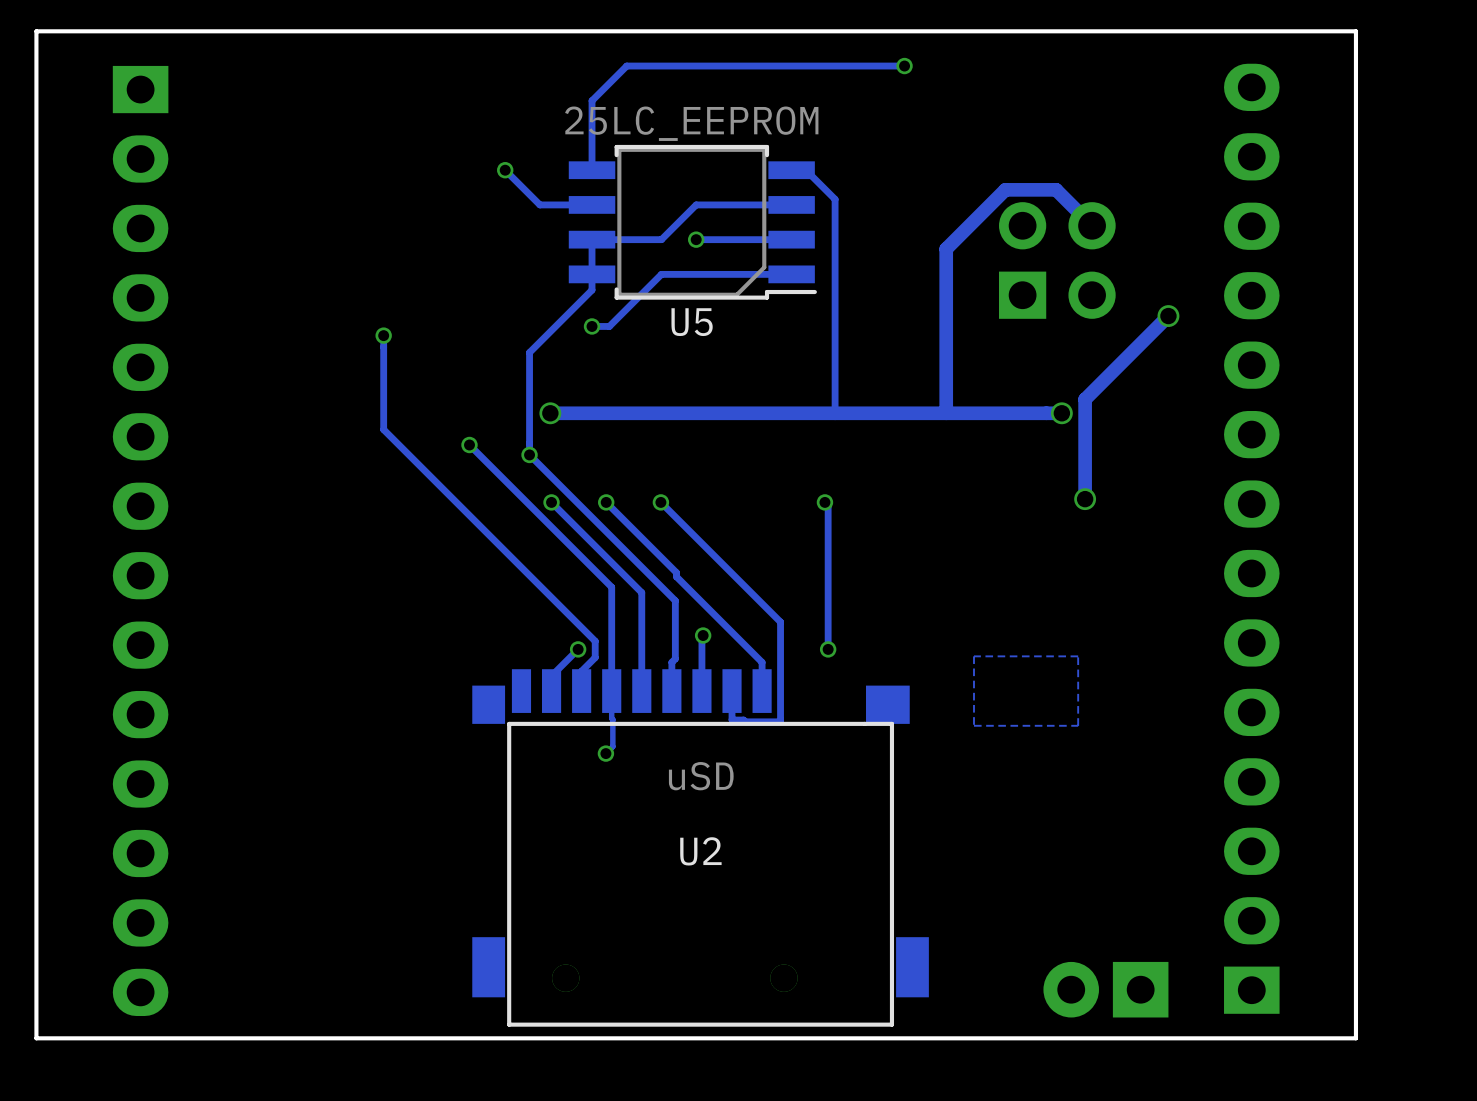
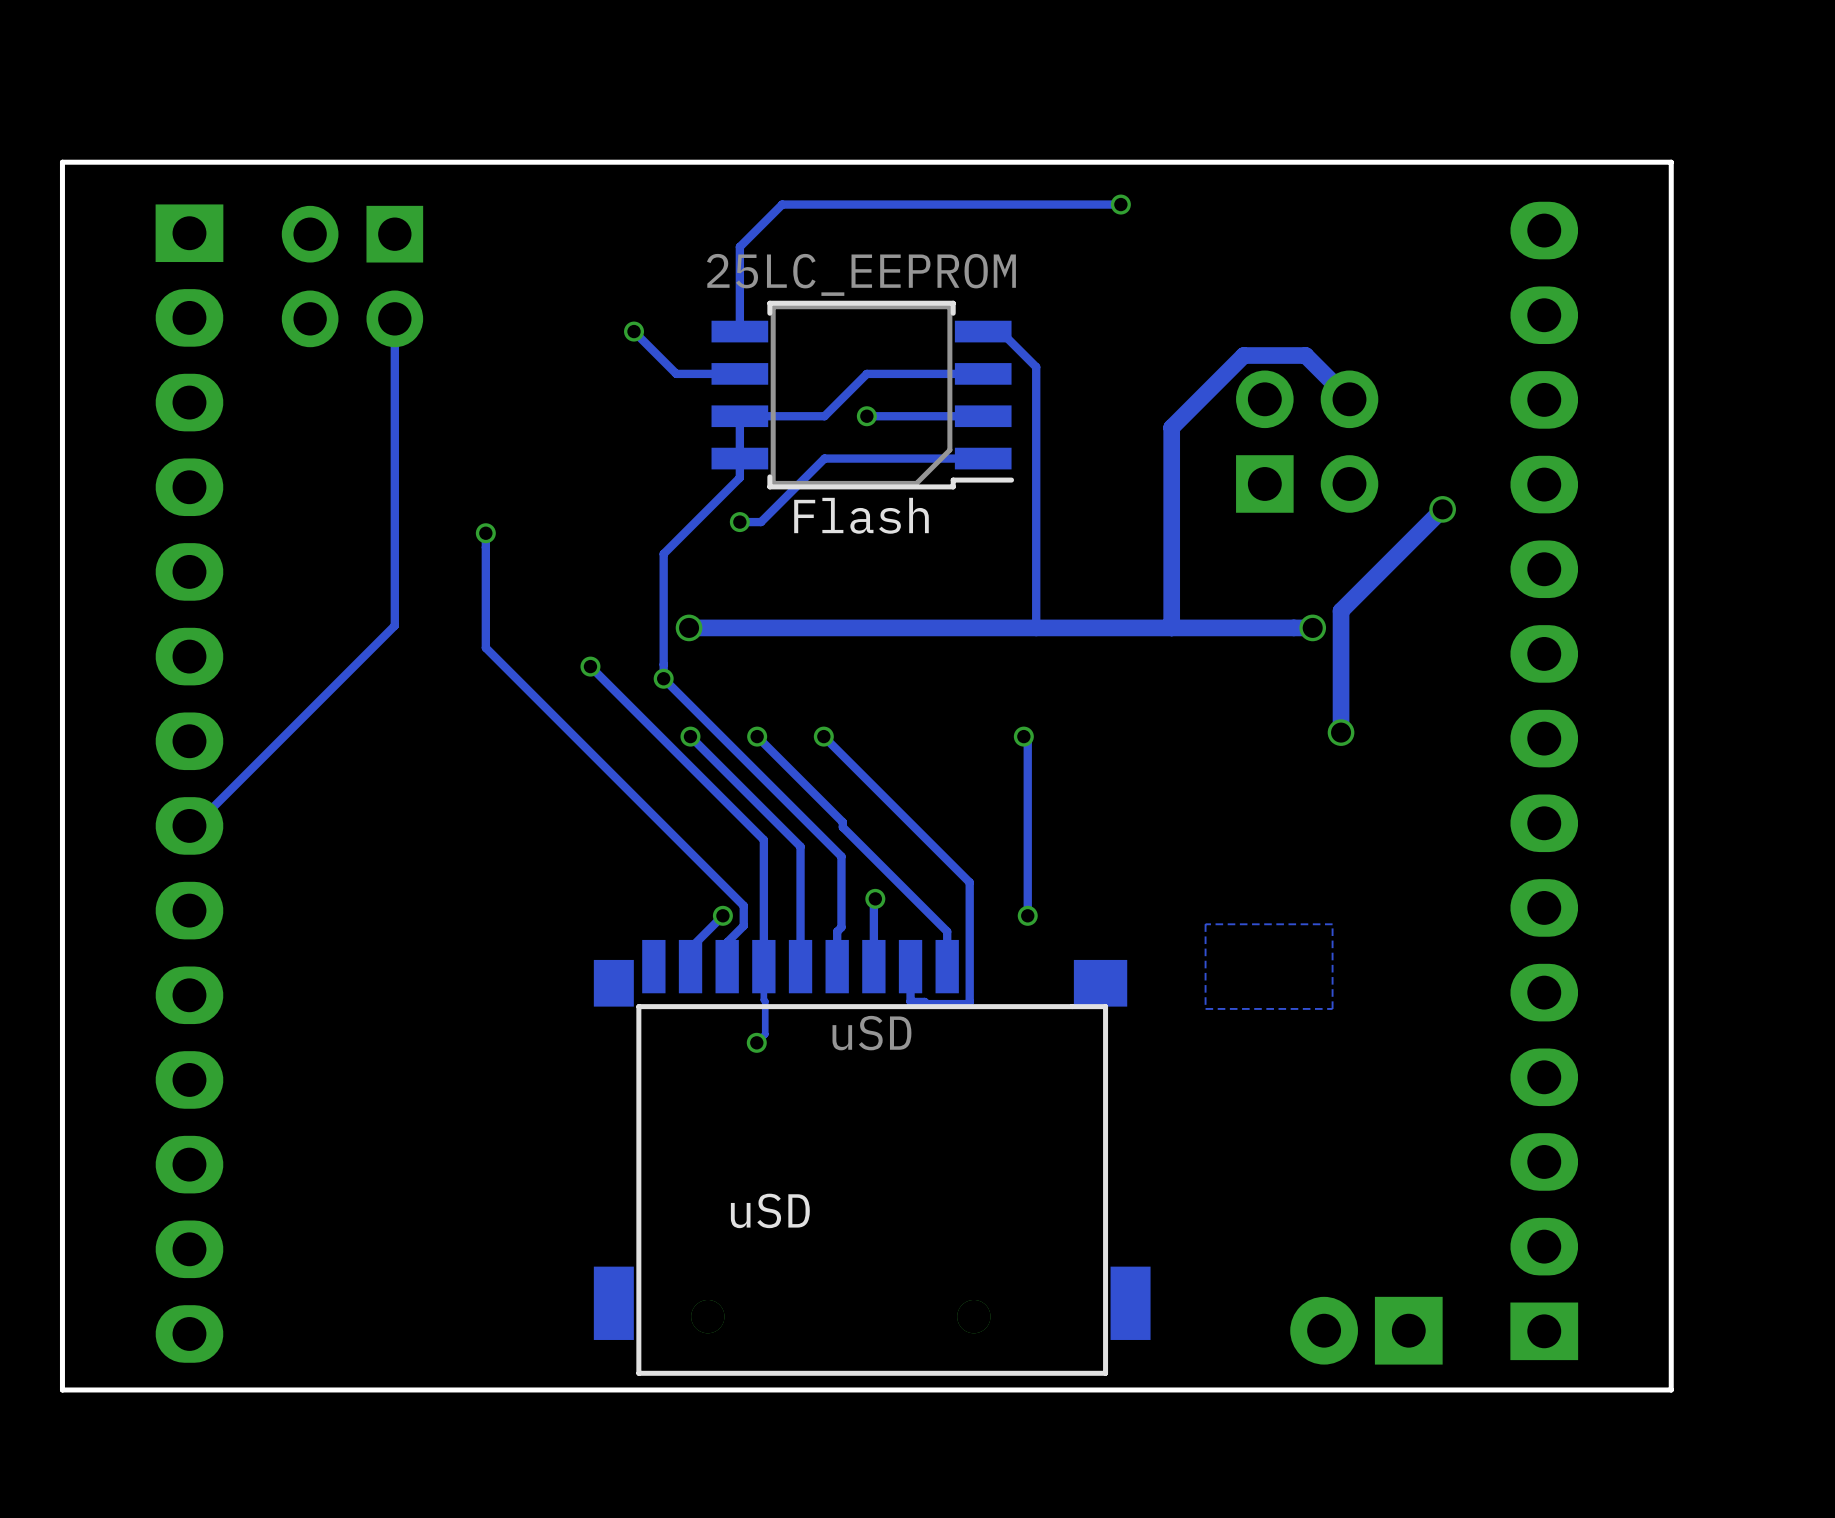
part: none -> (352, 276)
track: none -> (394, 318) (394, 625) (194, 825) (189, 825)
U5 name: U5 (692, 322) -> Flash (861, 515)
U2 value position: uSD (701, 776) -> uSD (871, 1033)
U2 name: U2 (700, 851) -> uSD (770, 1210)

